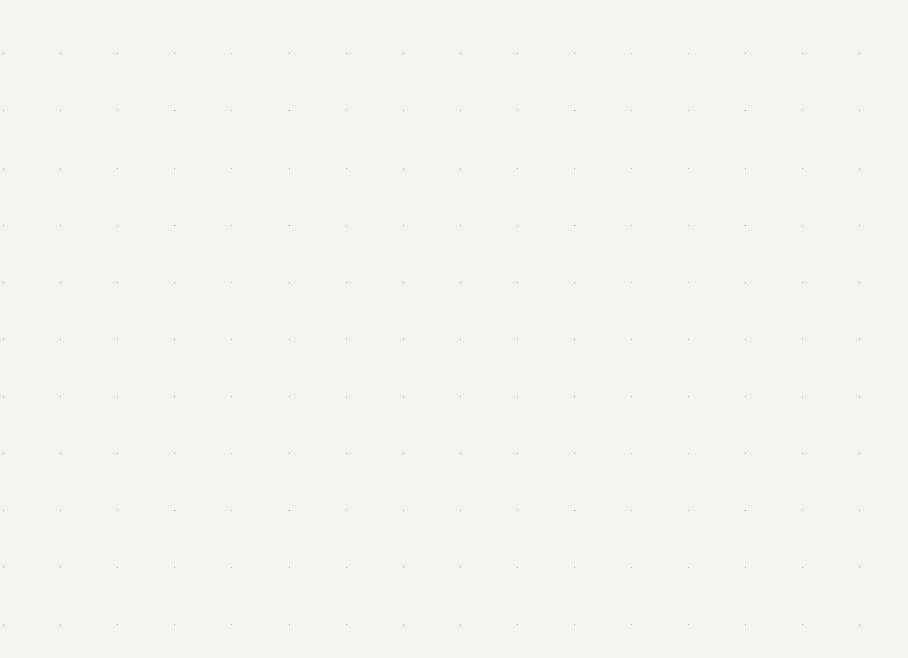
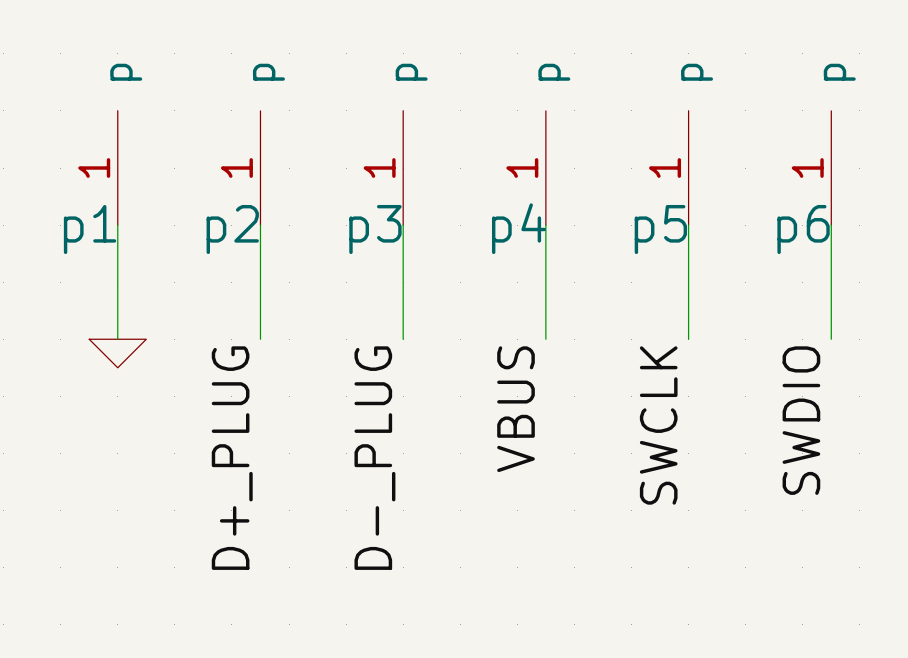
p1: none -> (117, 168)
p2: none -> (260, 168)
p3: none -> (403, 168)
p4: none -> (545, 168)
p5: none -> (688, 168)
p6: none -> (831, 168)
wire: none -> (117, 225) (117, 339)
wire: none -> (260, 225) (260, 339)
wire: none -> (403, 225) (403, 339)
wire: none -> (545, 225) (545, 339)
wire: none -> (688, 225) (688, 339)
wire: none -> (831, 225) (831, 339)
power symbol: none -> (117, 353)
label: none -> VBUS (516, 409)
label: none -> SWDIO (801, 420)
label: none -> SWCLK (658, 425)
label: none -> D+_PLUG (232, 458)
label: none -> D-_PLUG (374, 458)

